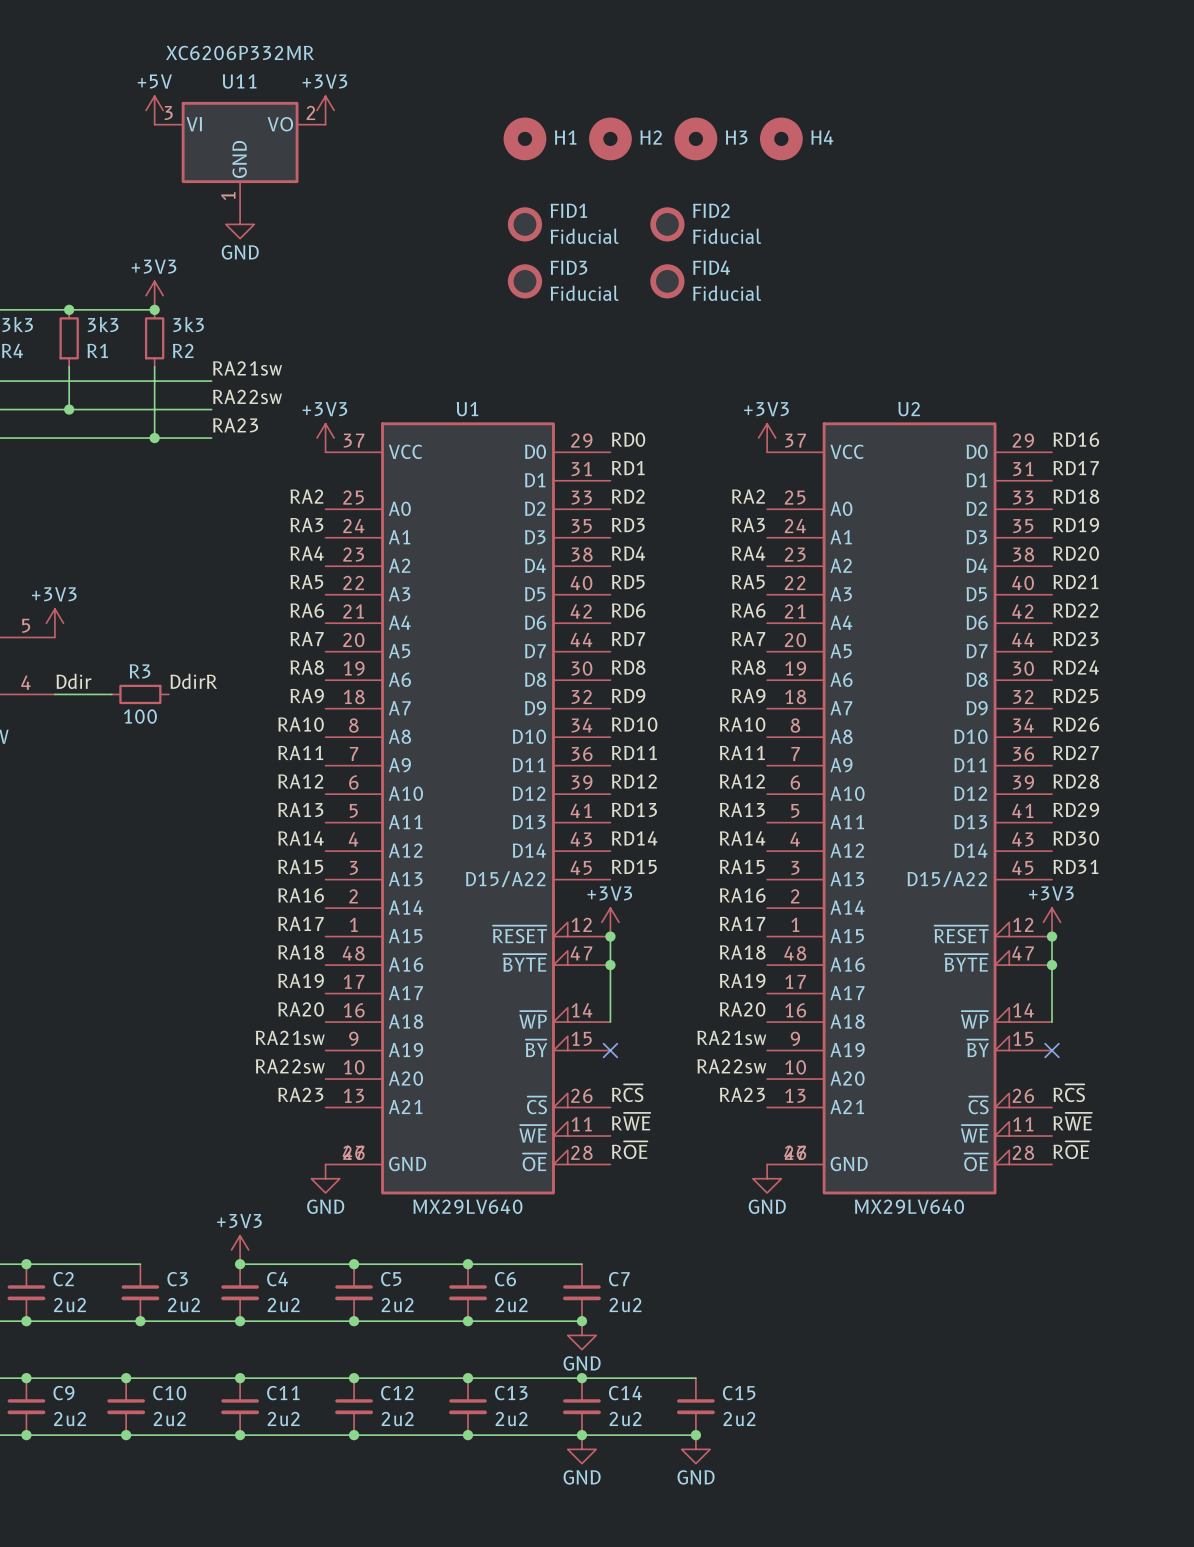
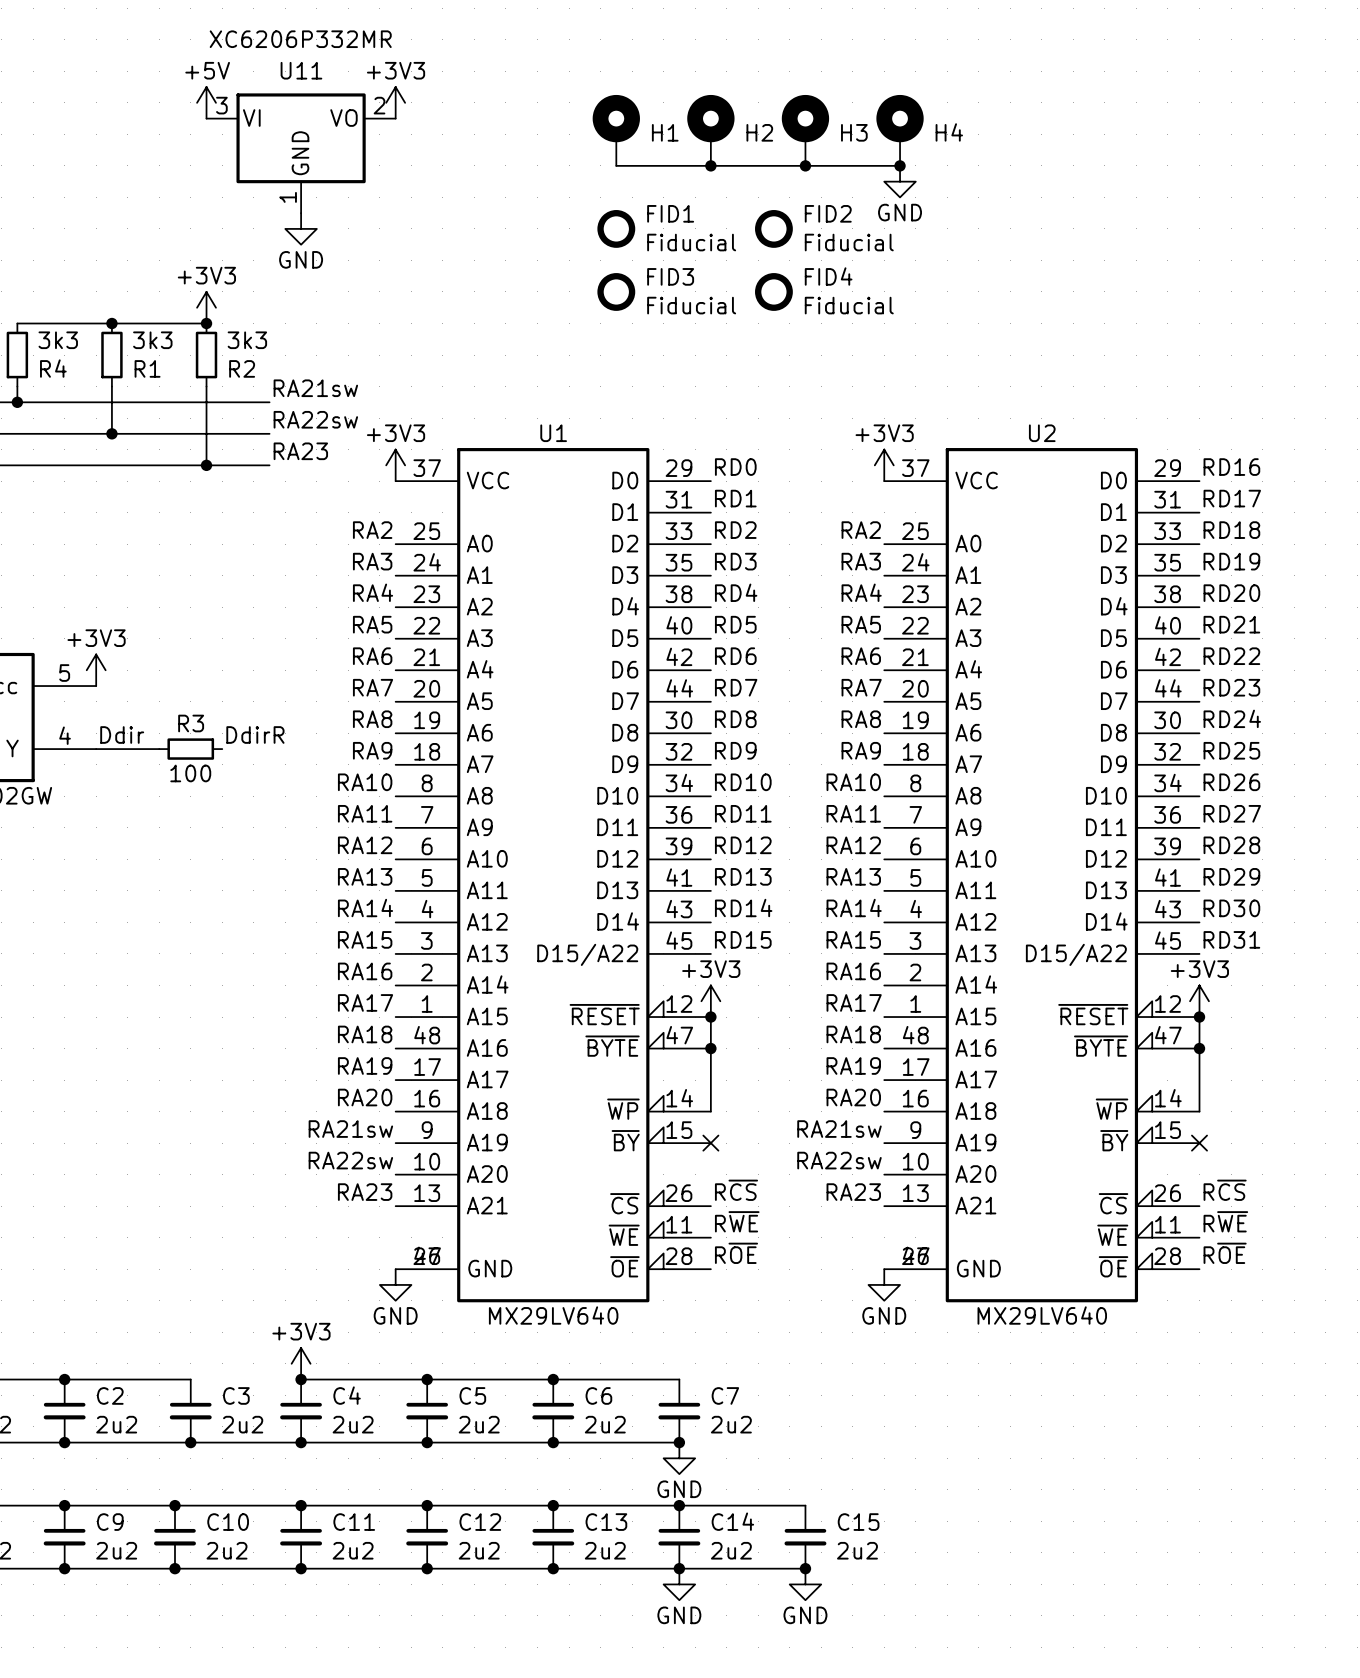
H1 symbol: [503, 117, 547, 161] -> [592, 94, 640, 166]
H2 symbol: [589, 117, 632, 161] -> [687, 94, 735, 166]
H3 symbol: [674, 117, 718, 161] -> [781, 94, 830, 166]
H4 symbol: [760, 117, 803, 161] -> [876, 94, 924, 166]
wire: none -> (616, 165) (900, 165)
junction: none -> (710, 165)
junction: none -> (805, 165)
junction: none -> (900, 165)
power symbol: none -> GND (900, 181)

